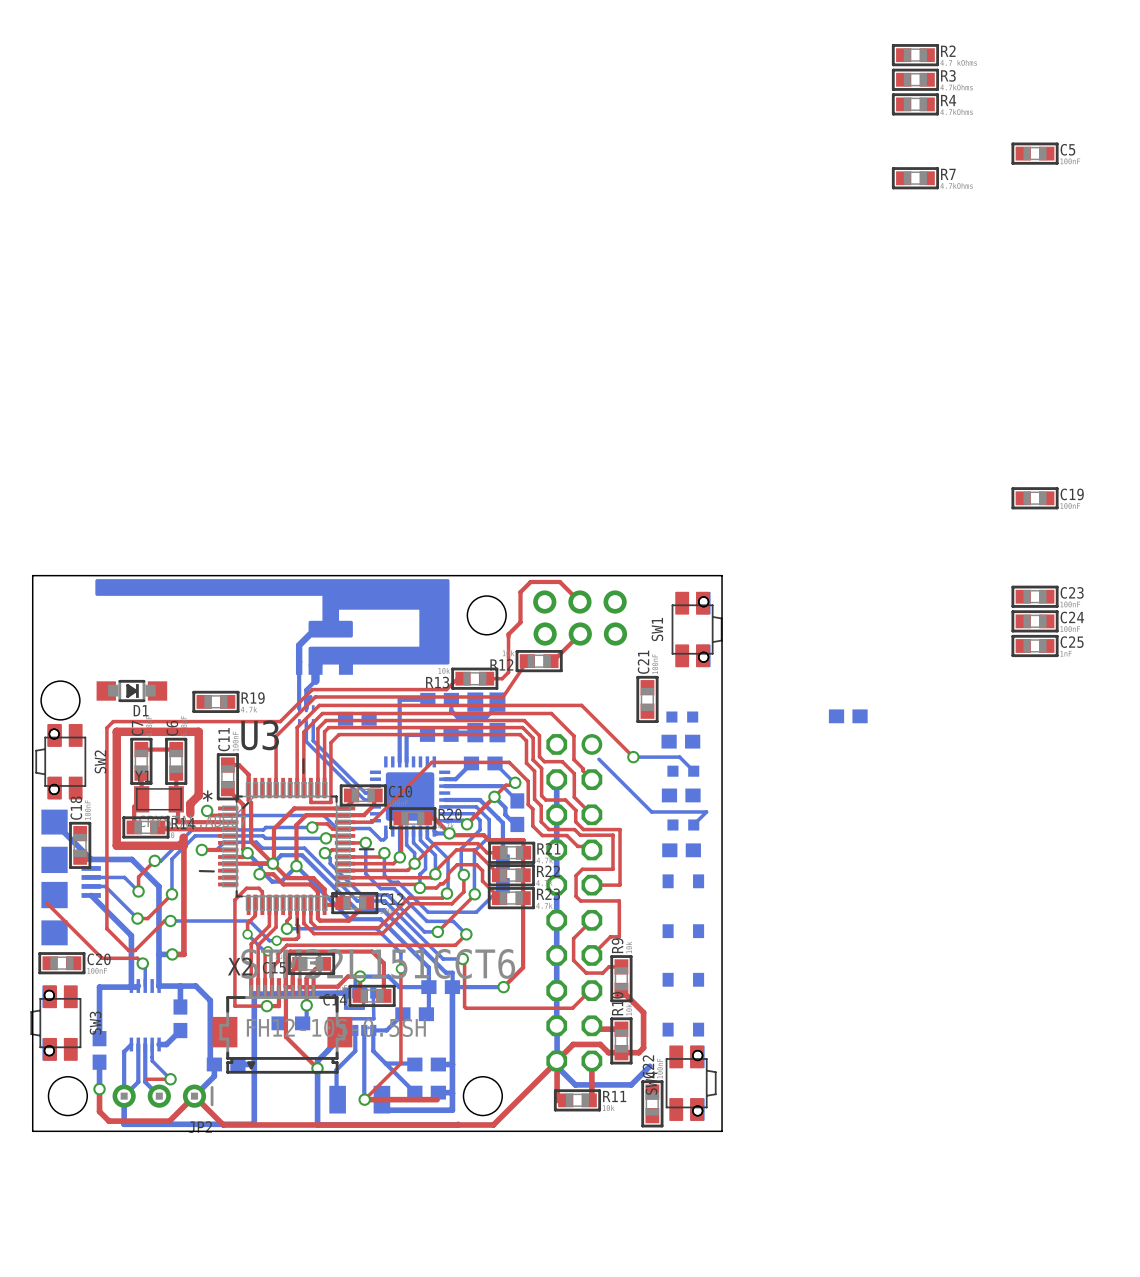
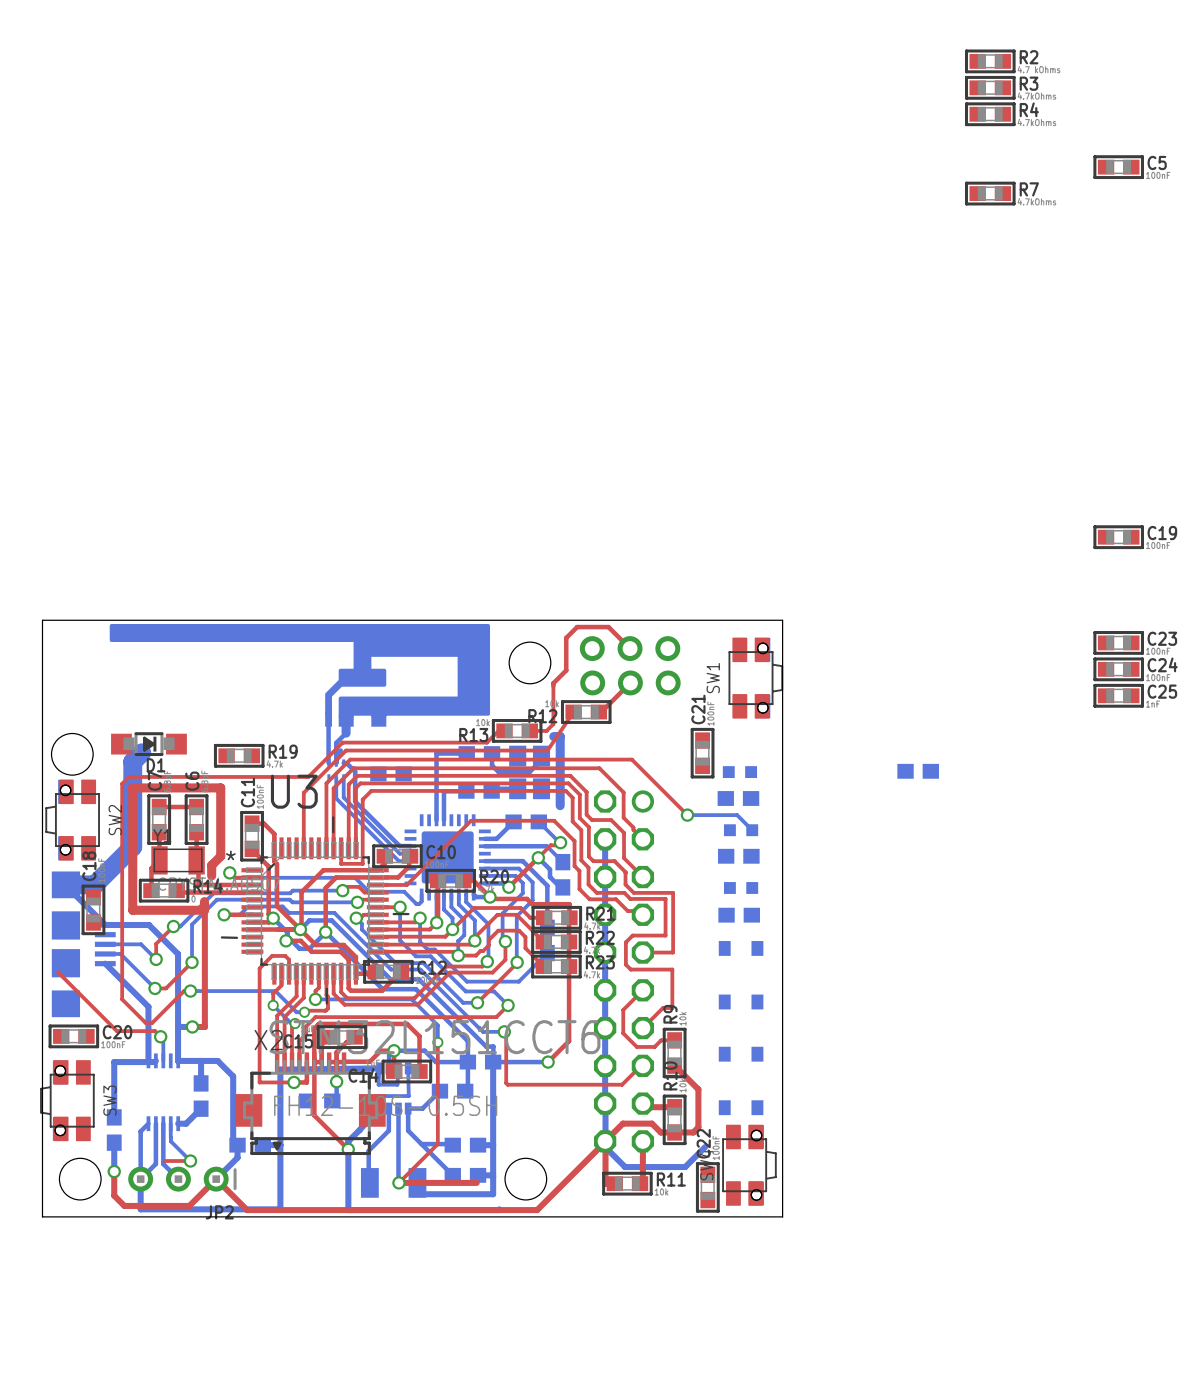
bottom track: none -> (553, 736) (560, 736) (560, 805)
bottom track: none -> (141, 752) (132, 761) (132, 846) (94, 884) (65, 884)
bottom track: none -> (343, 763) (346, 763) (355, 771) (355, 801) (399, 846) (410, 846)
bottom track: (598, 759) (651, 811) (706, 811) (693, 824) -> none

